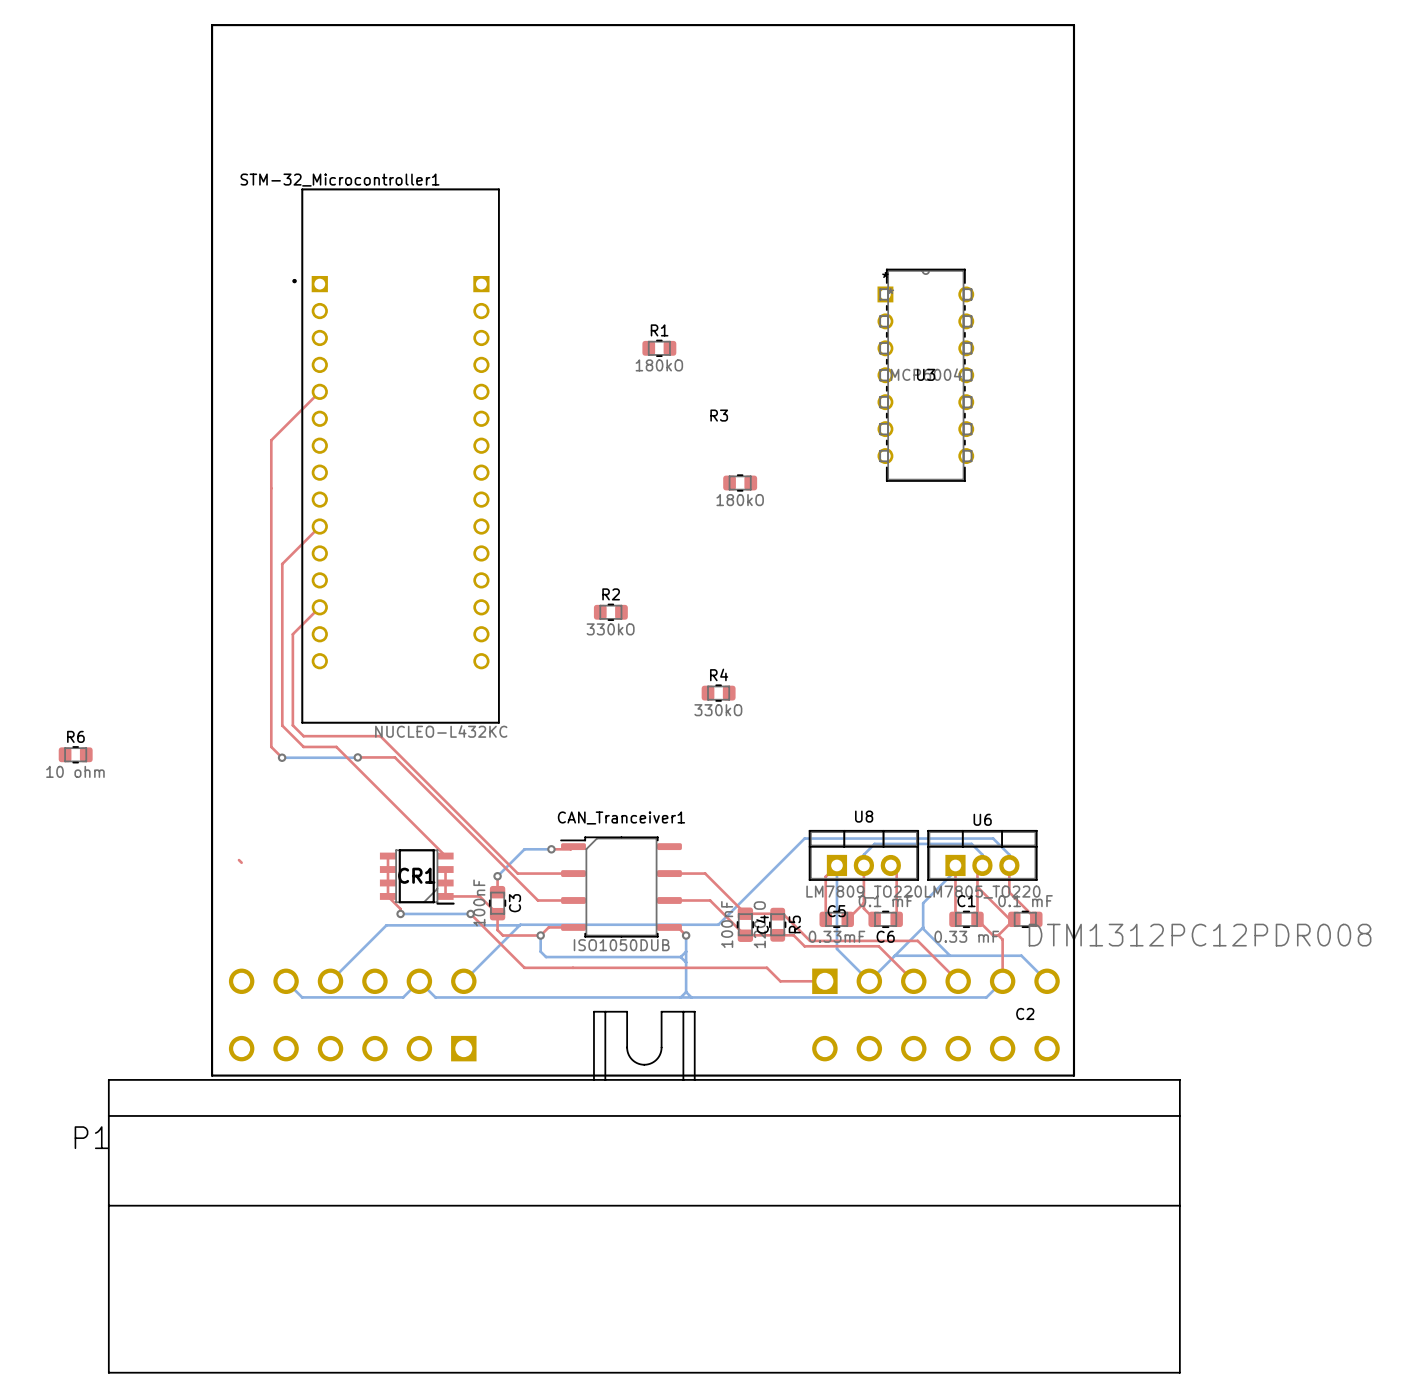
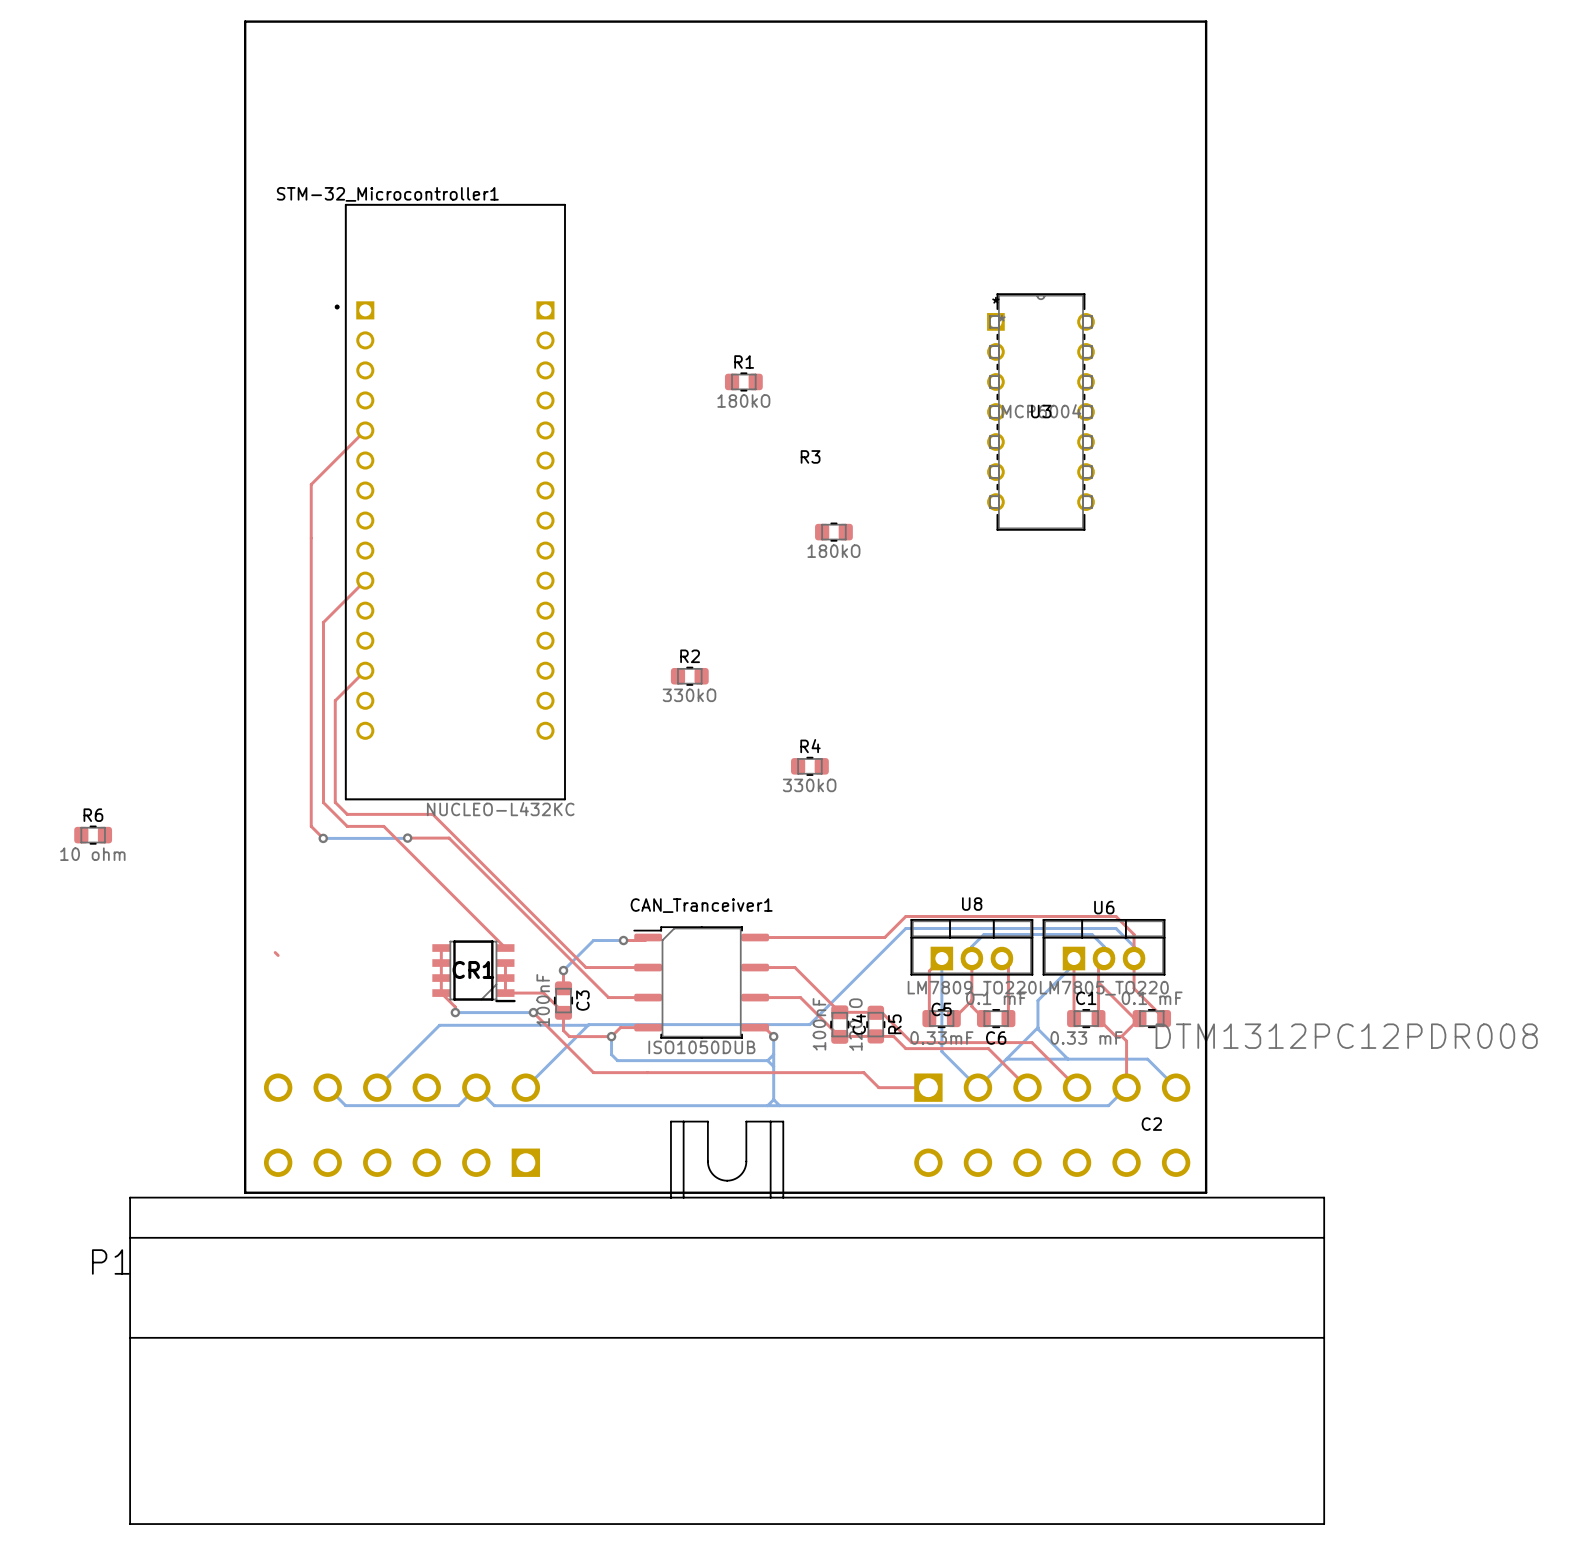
top track: none -> (755, 937) (884, 937) (905, 916) (1116, 916) (1134, 934) (1134, 958)

